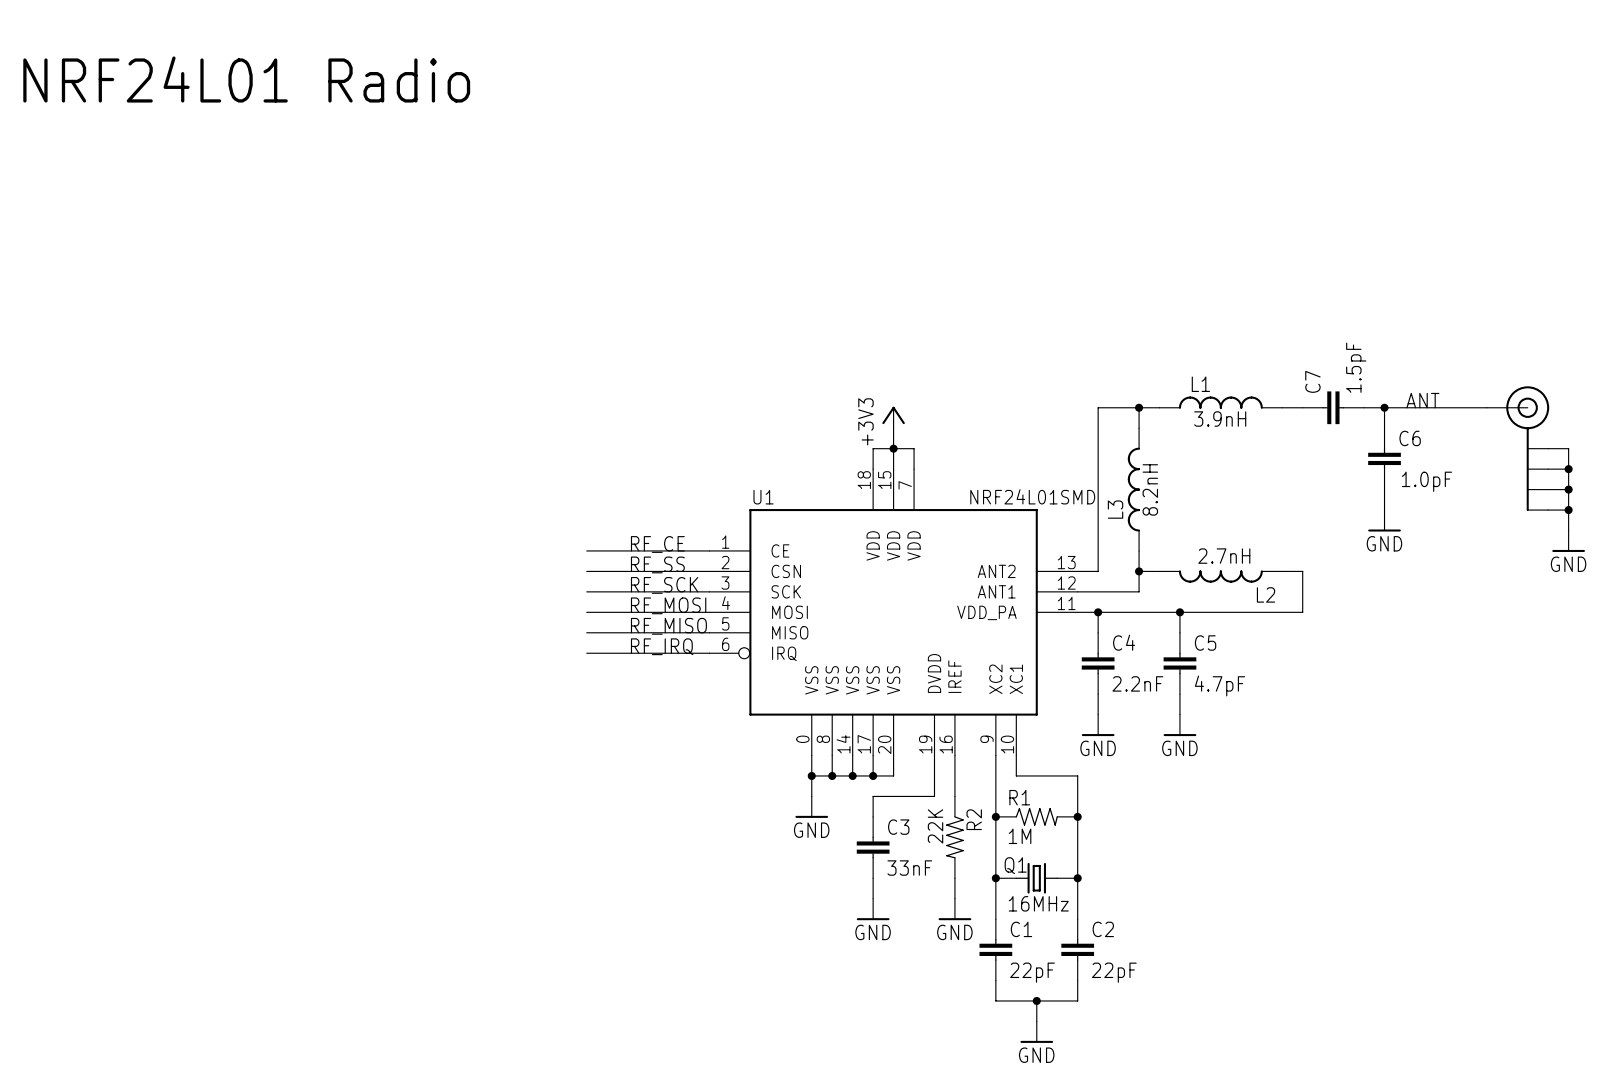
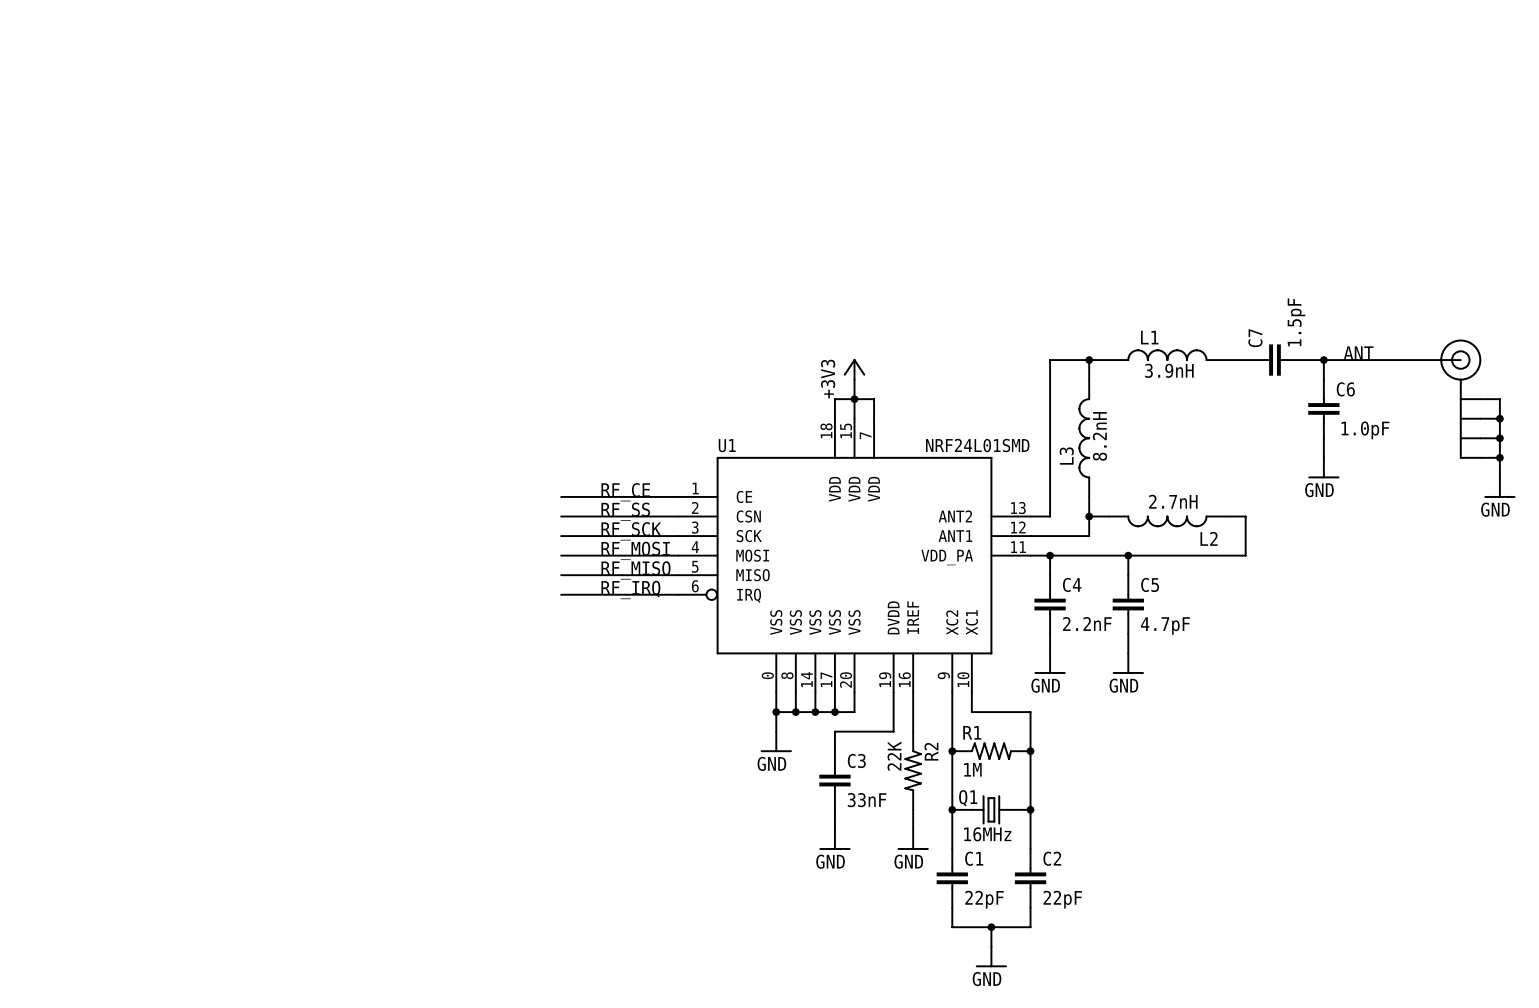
text: NRF24L01 Radio (246, 79) -> none

